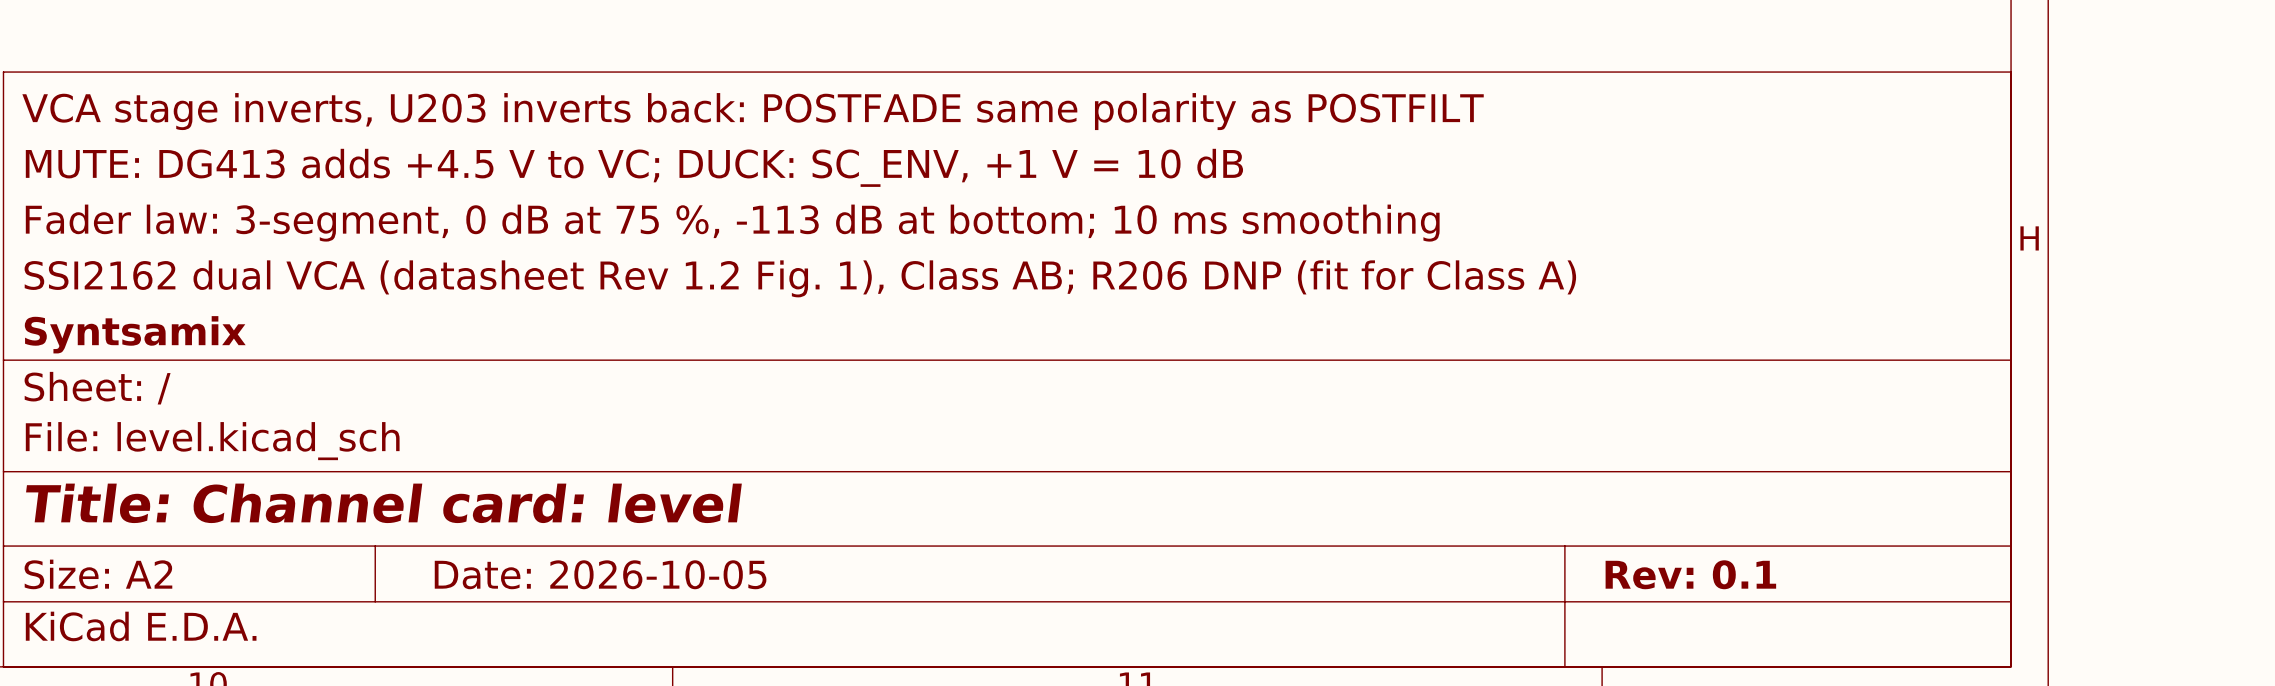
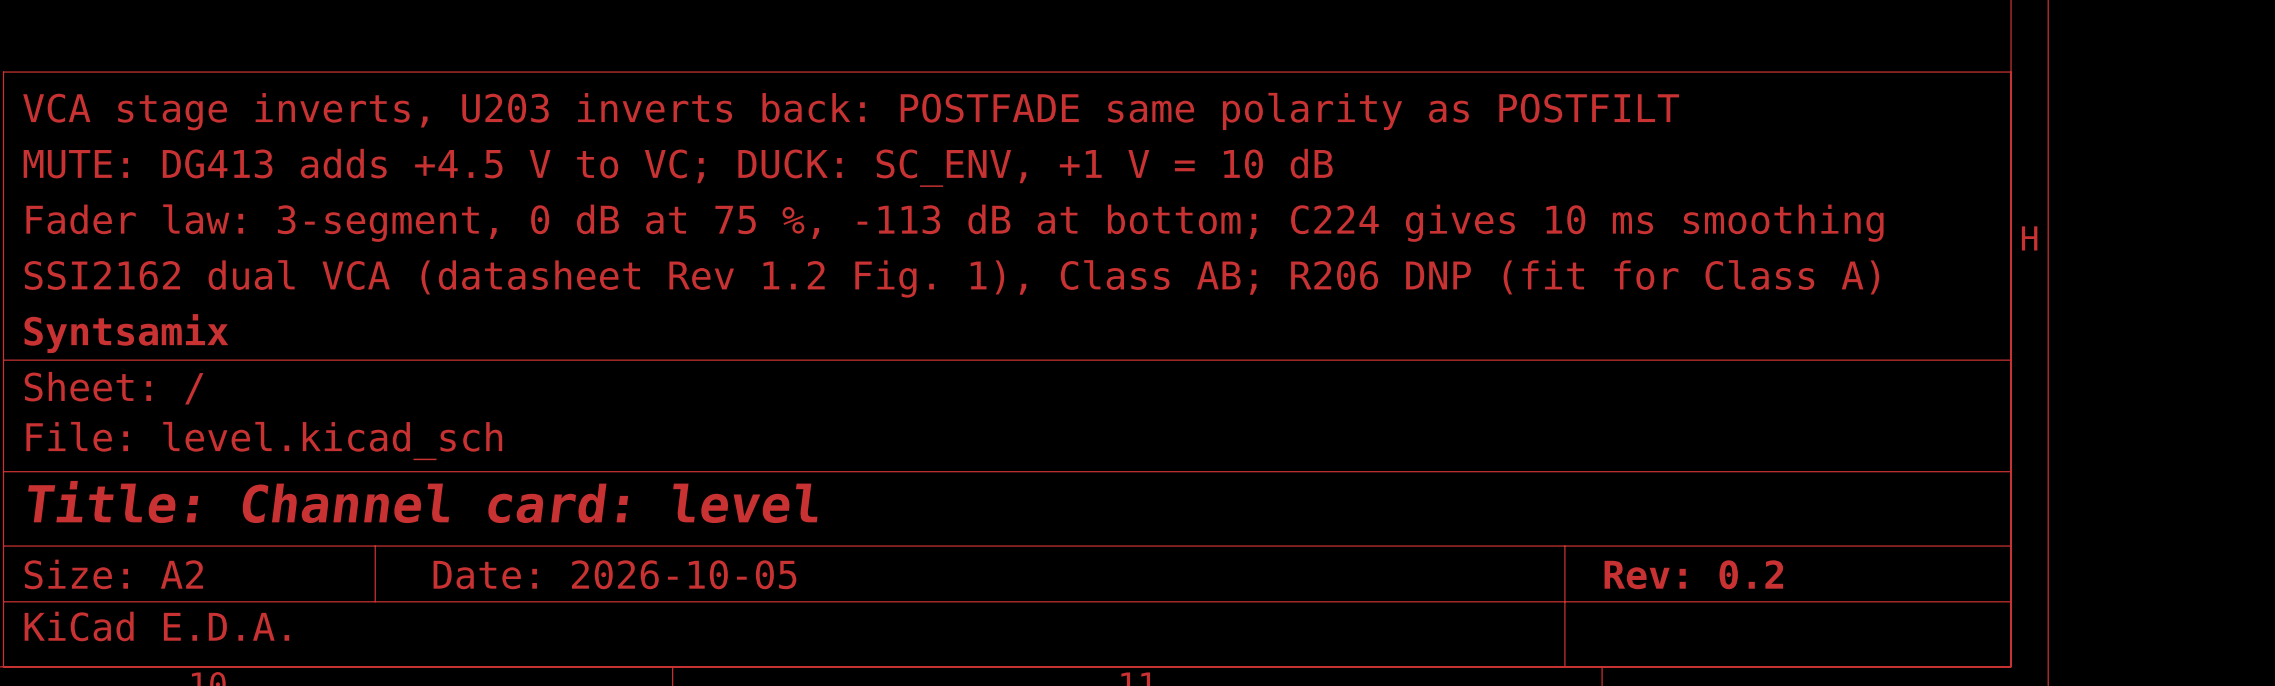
title block: Fader law: 3-segment, 0 dB at 75 %, -113 dB at bottom; 10 ms smoothing (732, 223) -> Fader law: 3-segment, 0 dB at 75 %, -113 dB at bottom; C224 gives 10 ms smoothing (954, 223)
title block: Rev: 0.1 (1690, 574) -> Rev: 0.2 (1693, 574)

